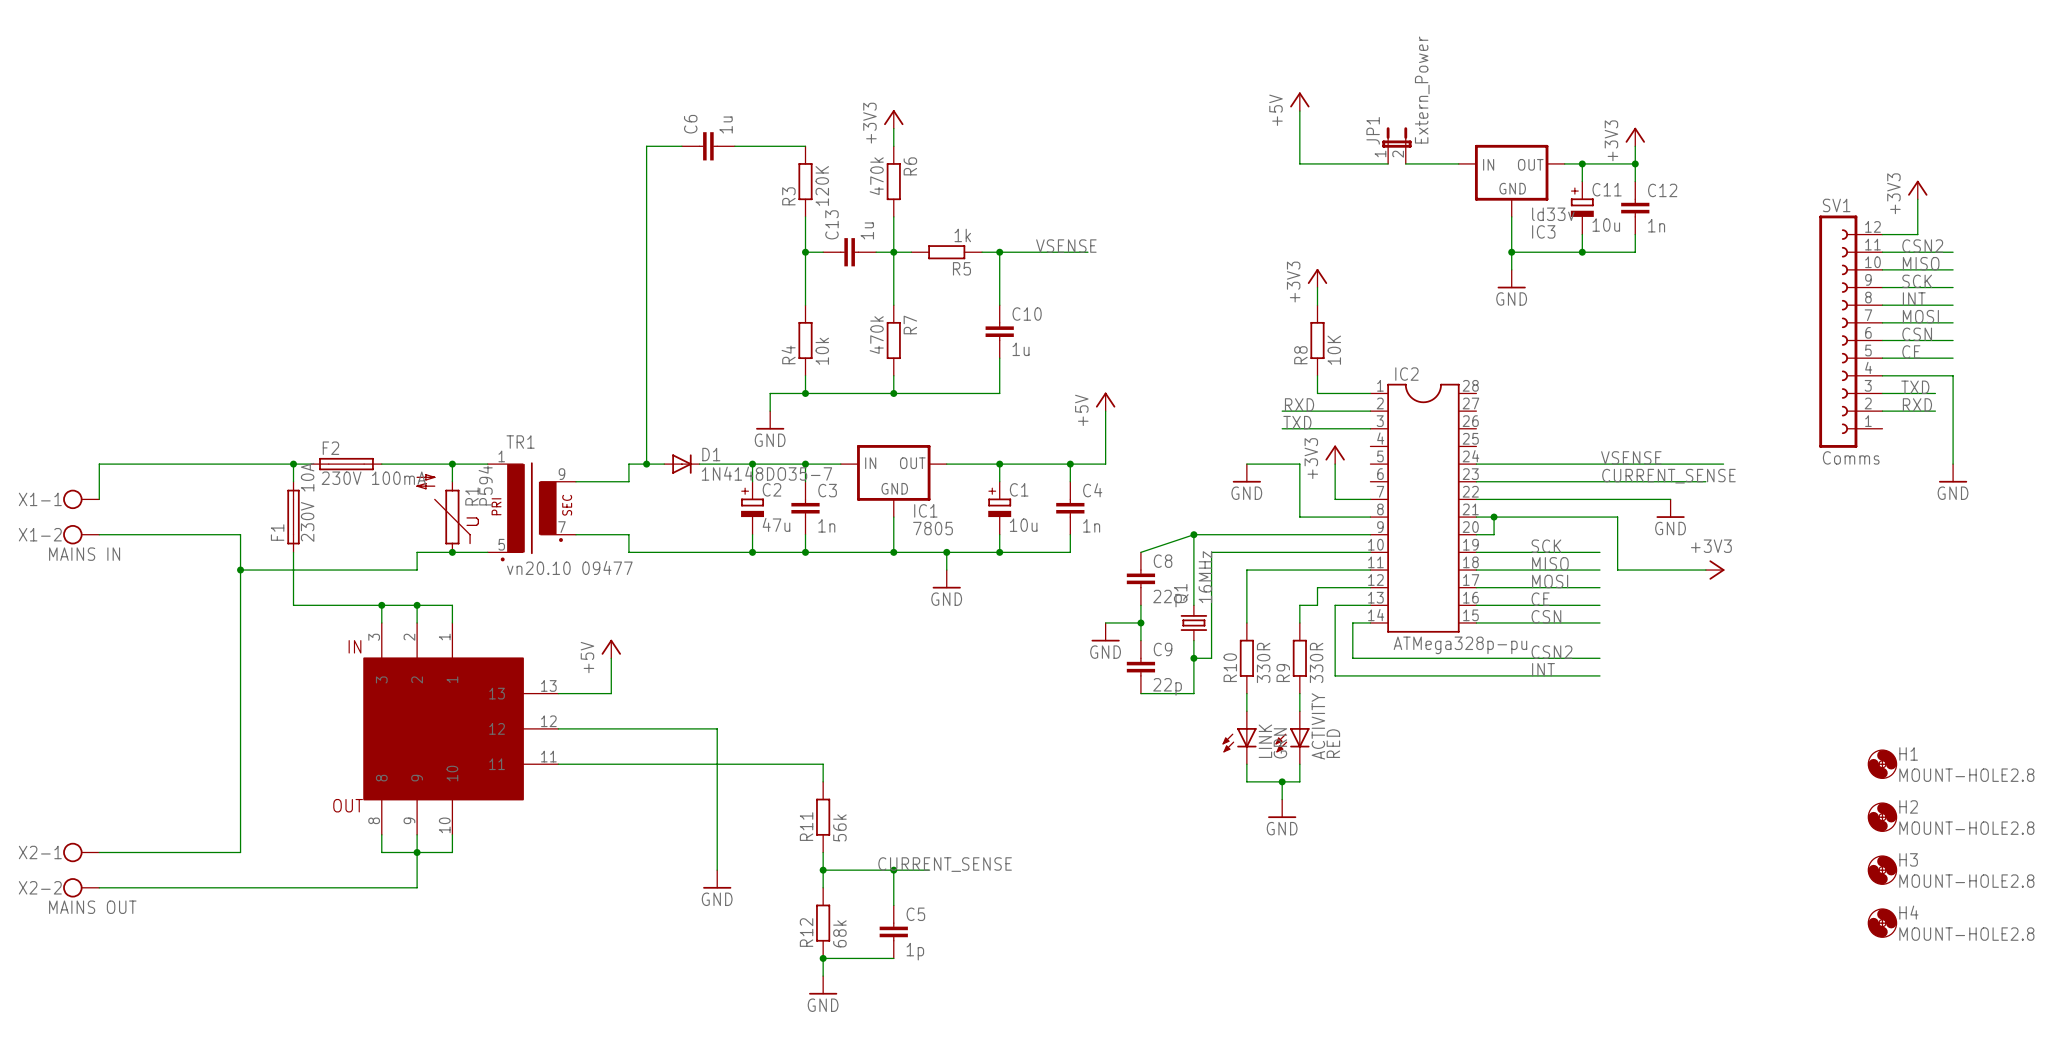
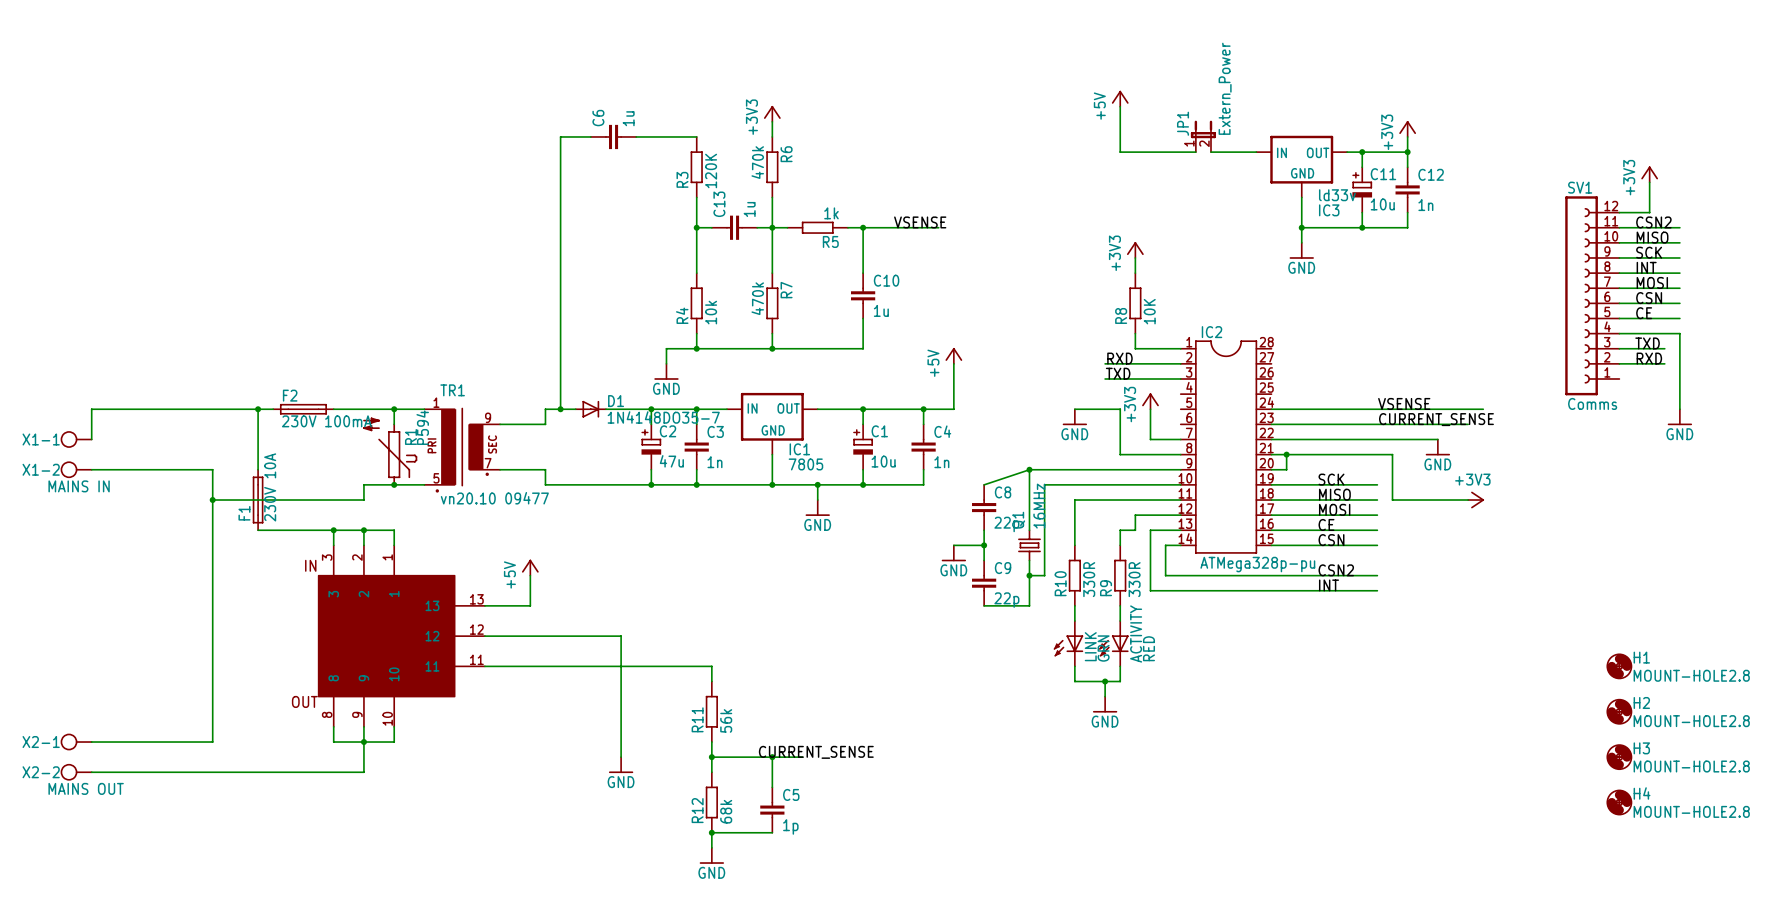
F1 position: (293, 517) -> (258, 500)

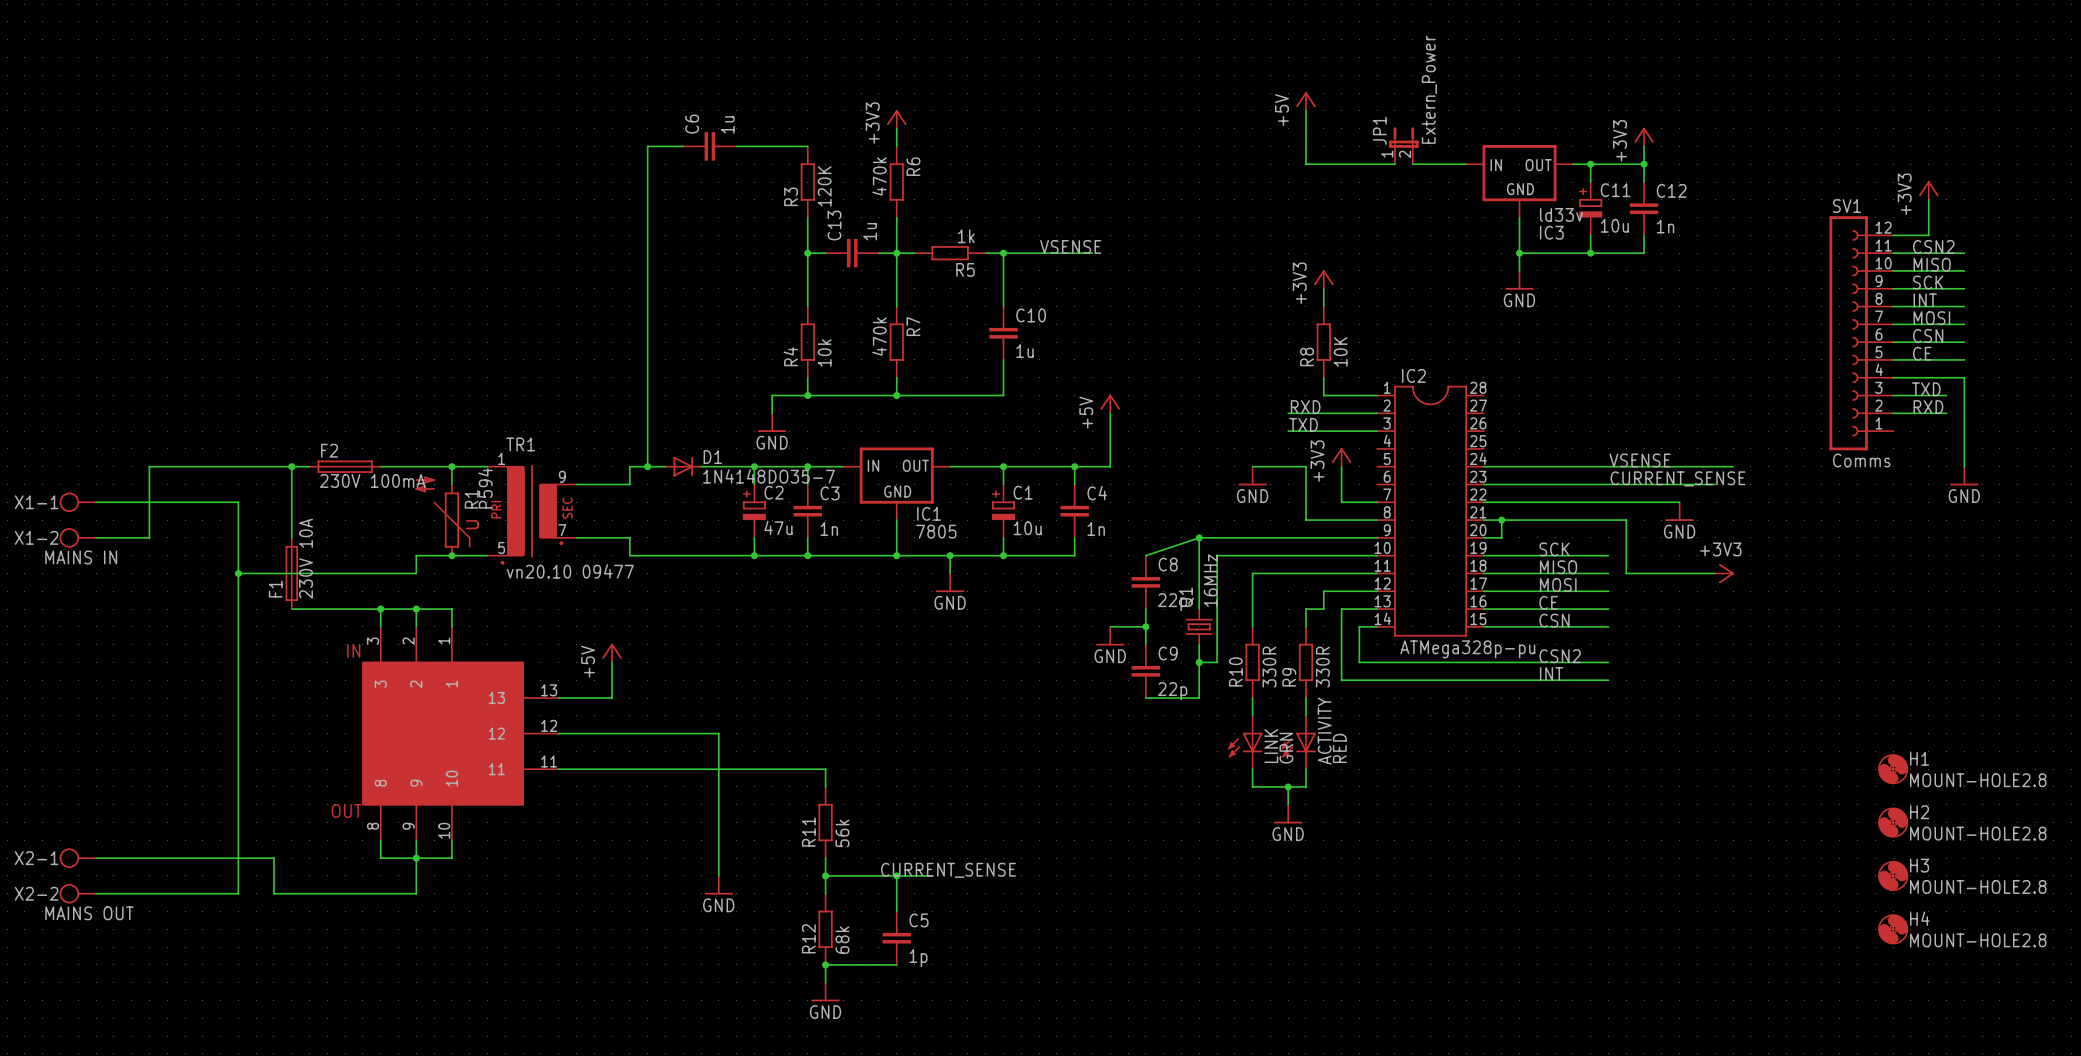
wire: (137, 409) (91, 409) (91, 439) -> (149, 466) (149, 537)
wire: (137, 469) (212, 469) -> (96, 502) (238, 502) (238, 537)
wire: (212, 772) (242, 772) -> (238, 893) (238, 858) (273, 858) (273, 893)

